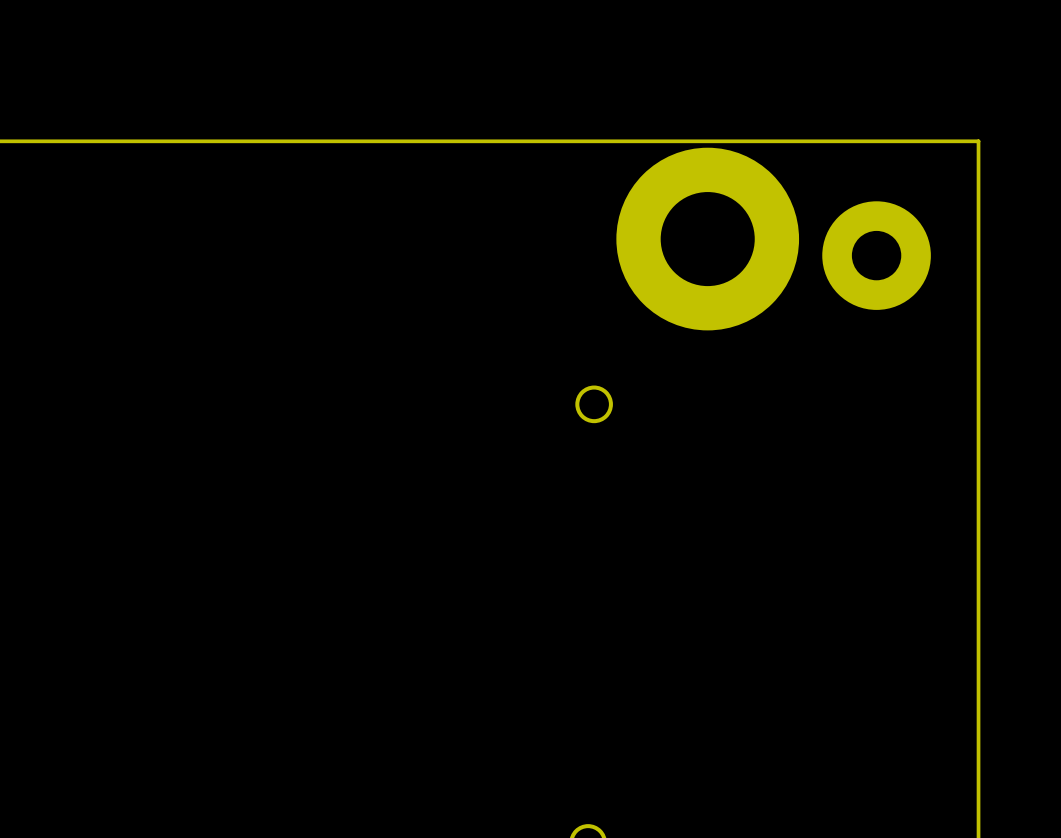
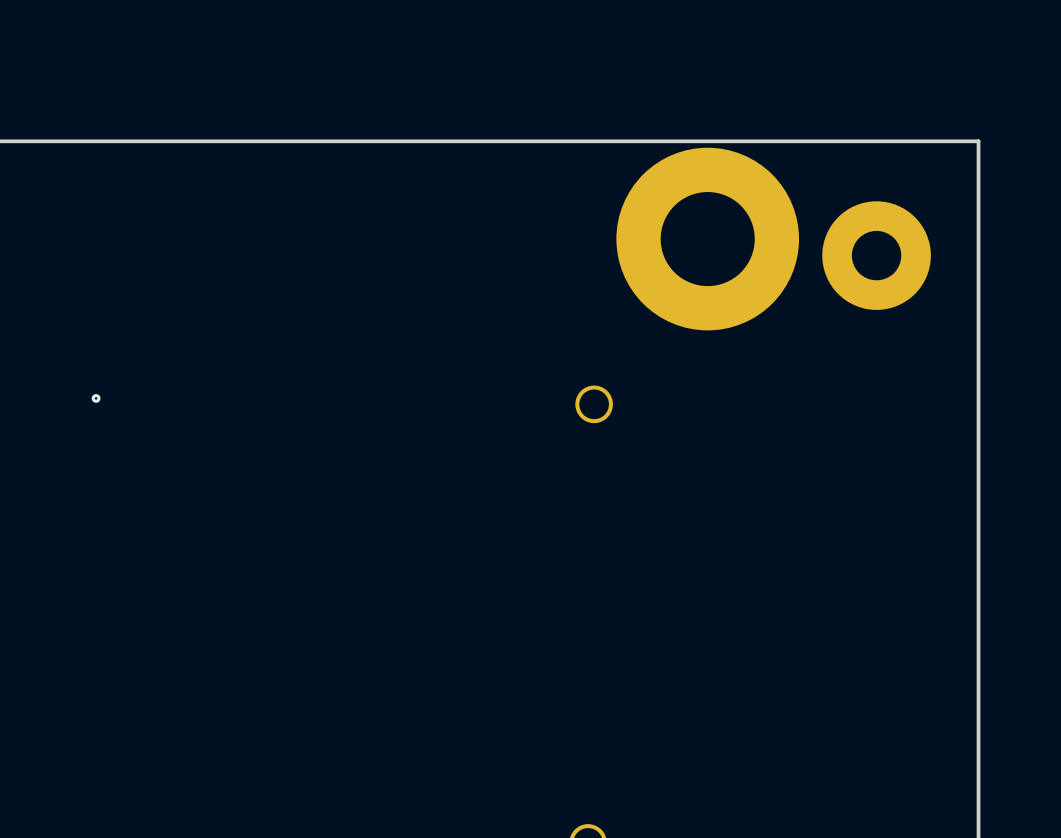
via: none -> (96, 398)

